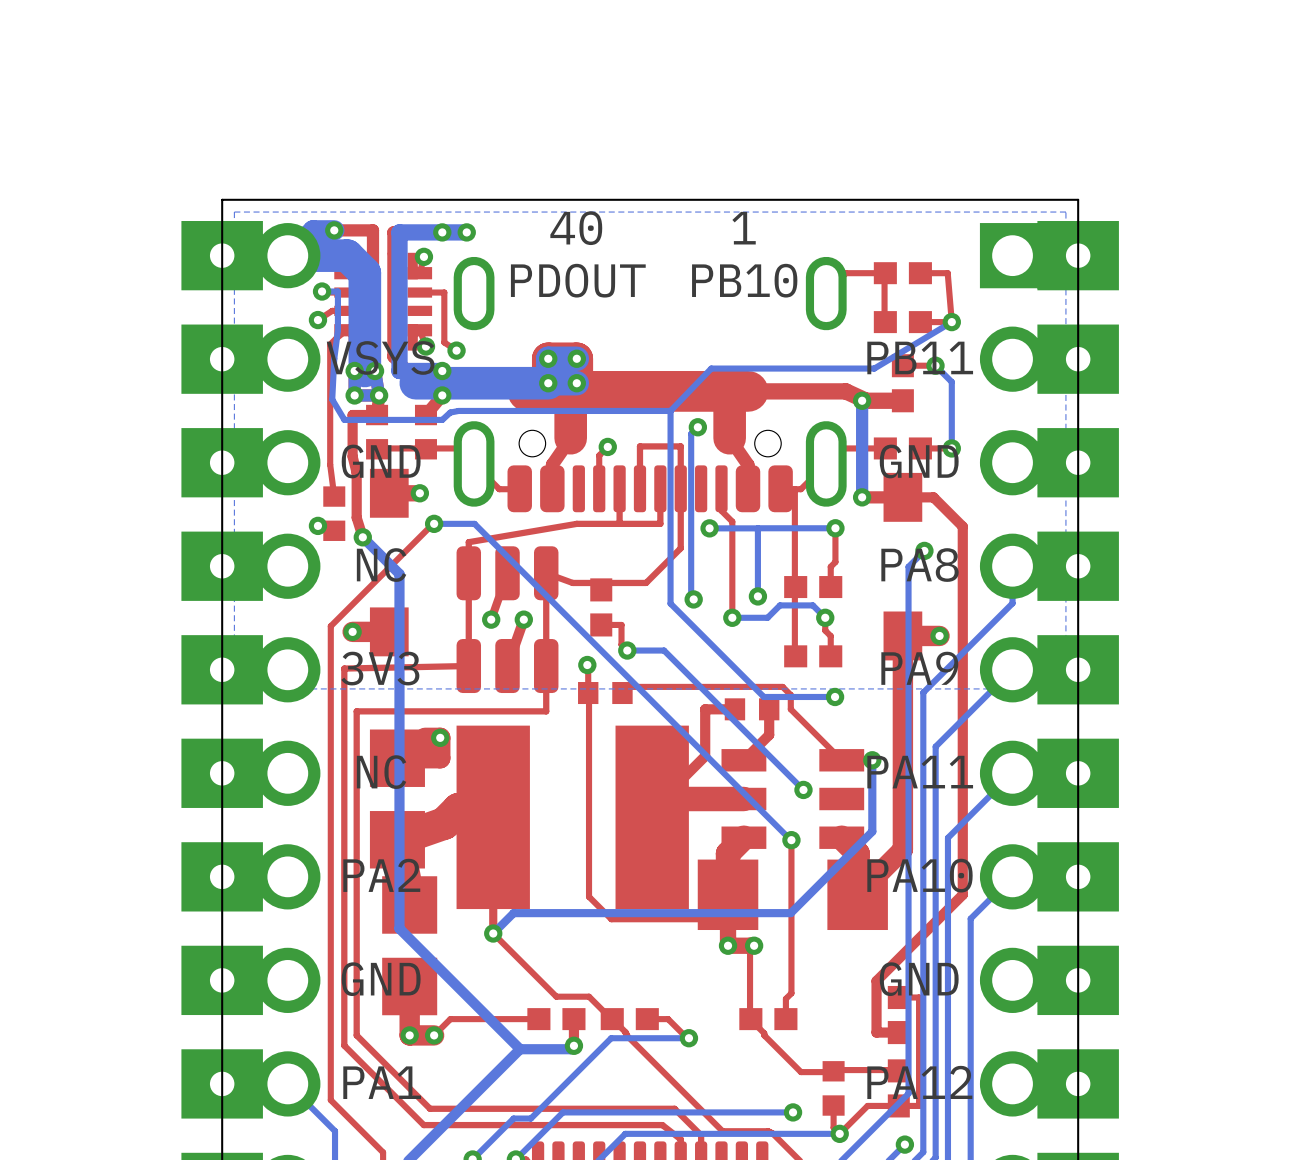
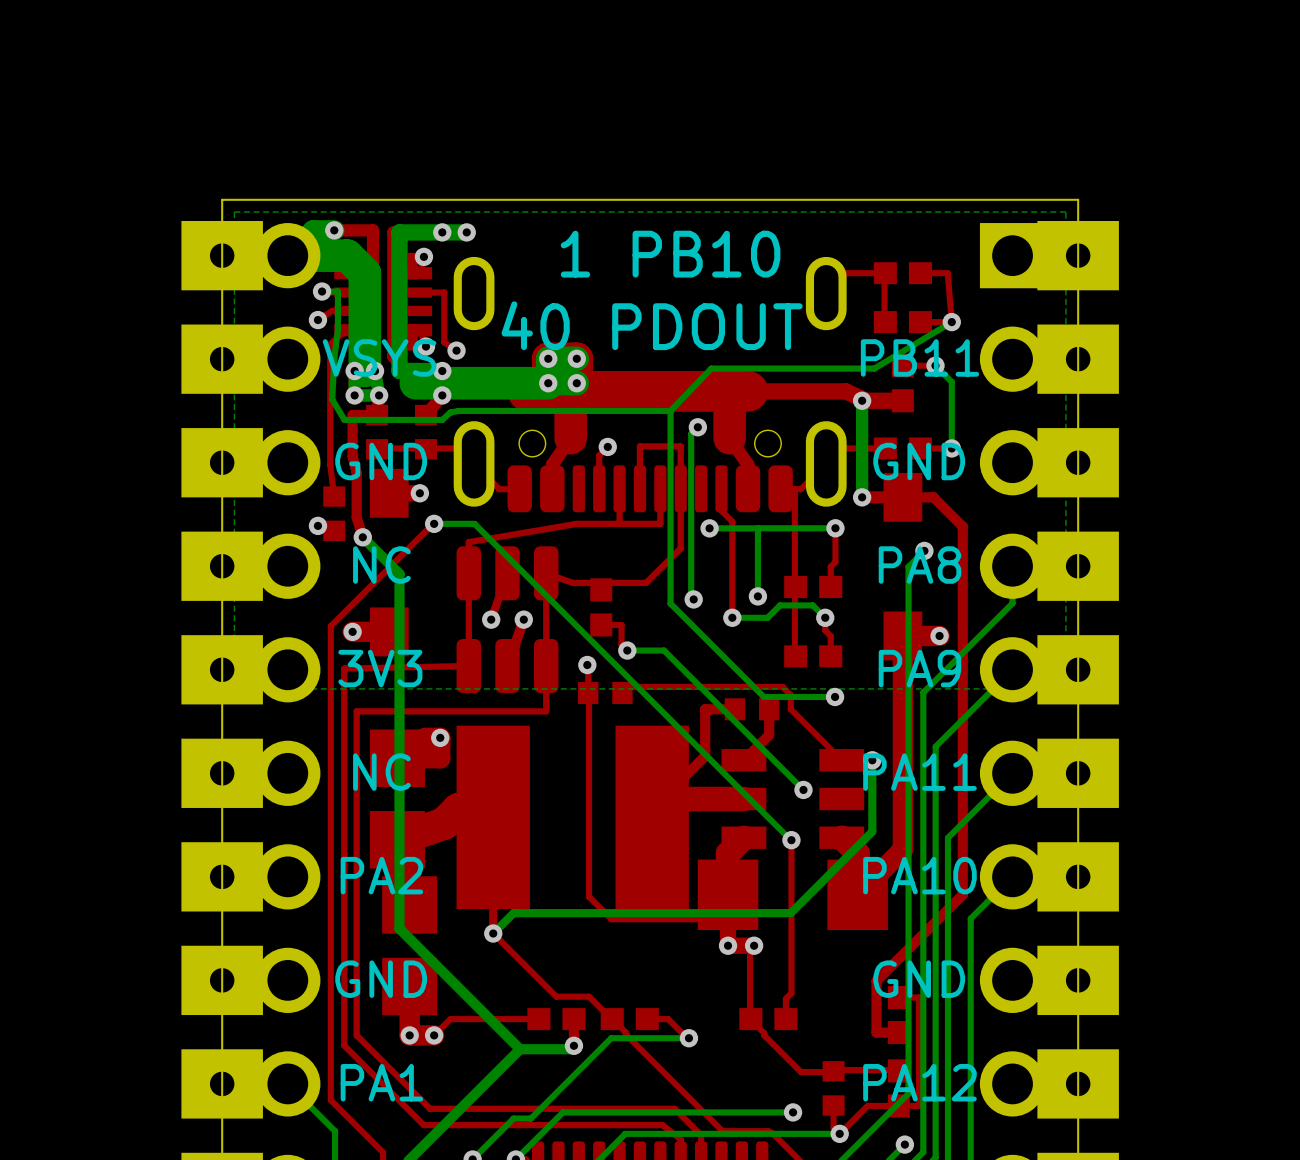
text: 40 (576, 228) -> none
text: 1 (744, 228) -> none
text: PDOUT (578, 280) -> 40 PDOUT (652, 325)
text: PB10 (744, 280) -> 1 PB10 (670, 254)

